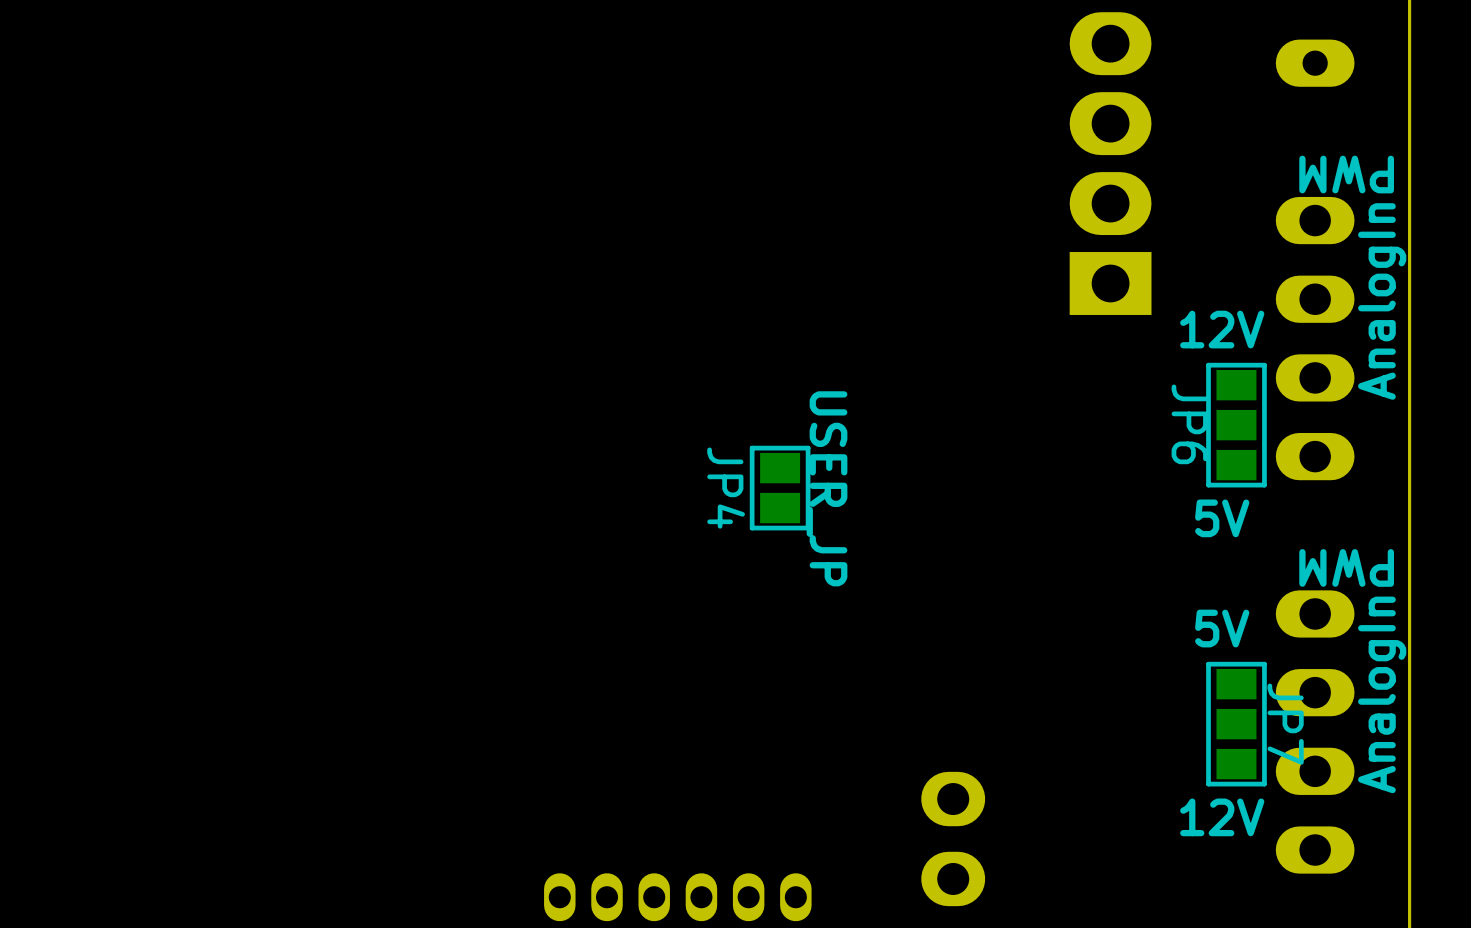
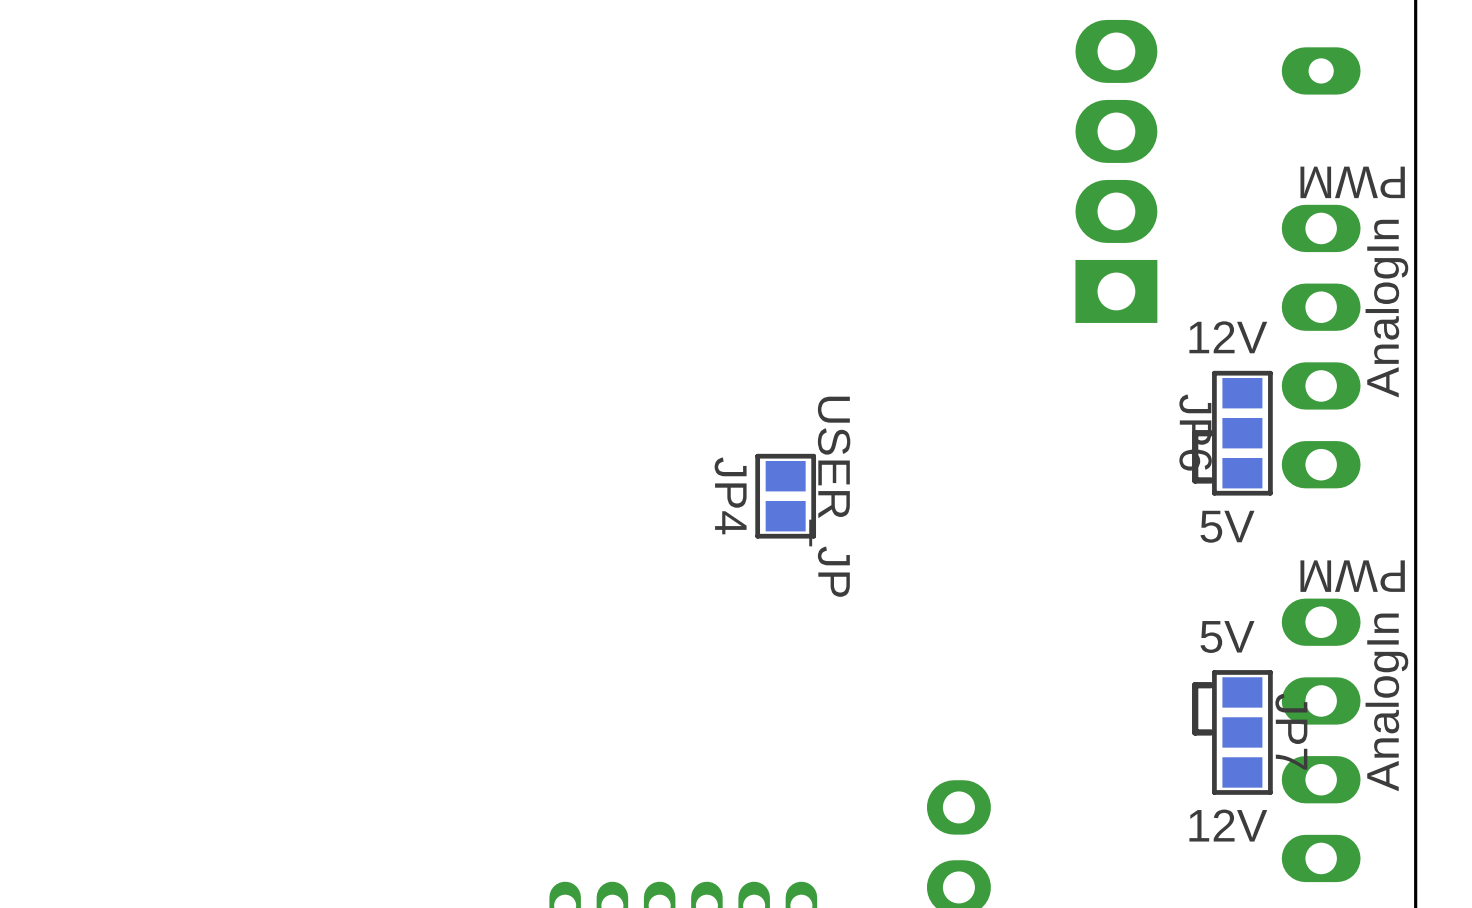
line: none -> (1210, 433) (1195, 433) (1195, 480) (1210, 480)
line: none -> (1210, 685) (1195, 685) (1195, 732) (1210, 732)

